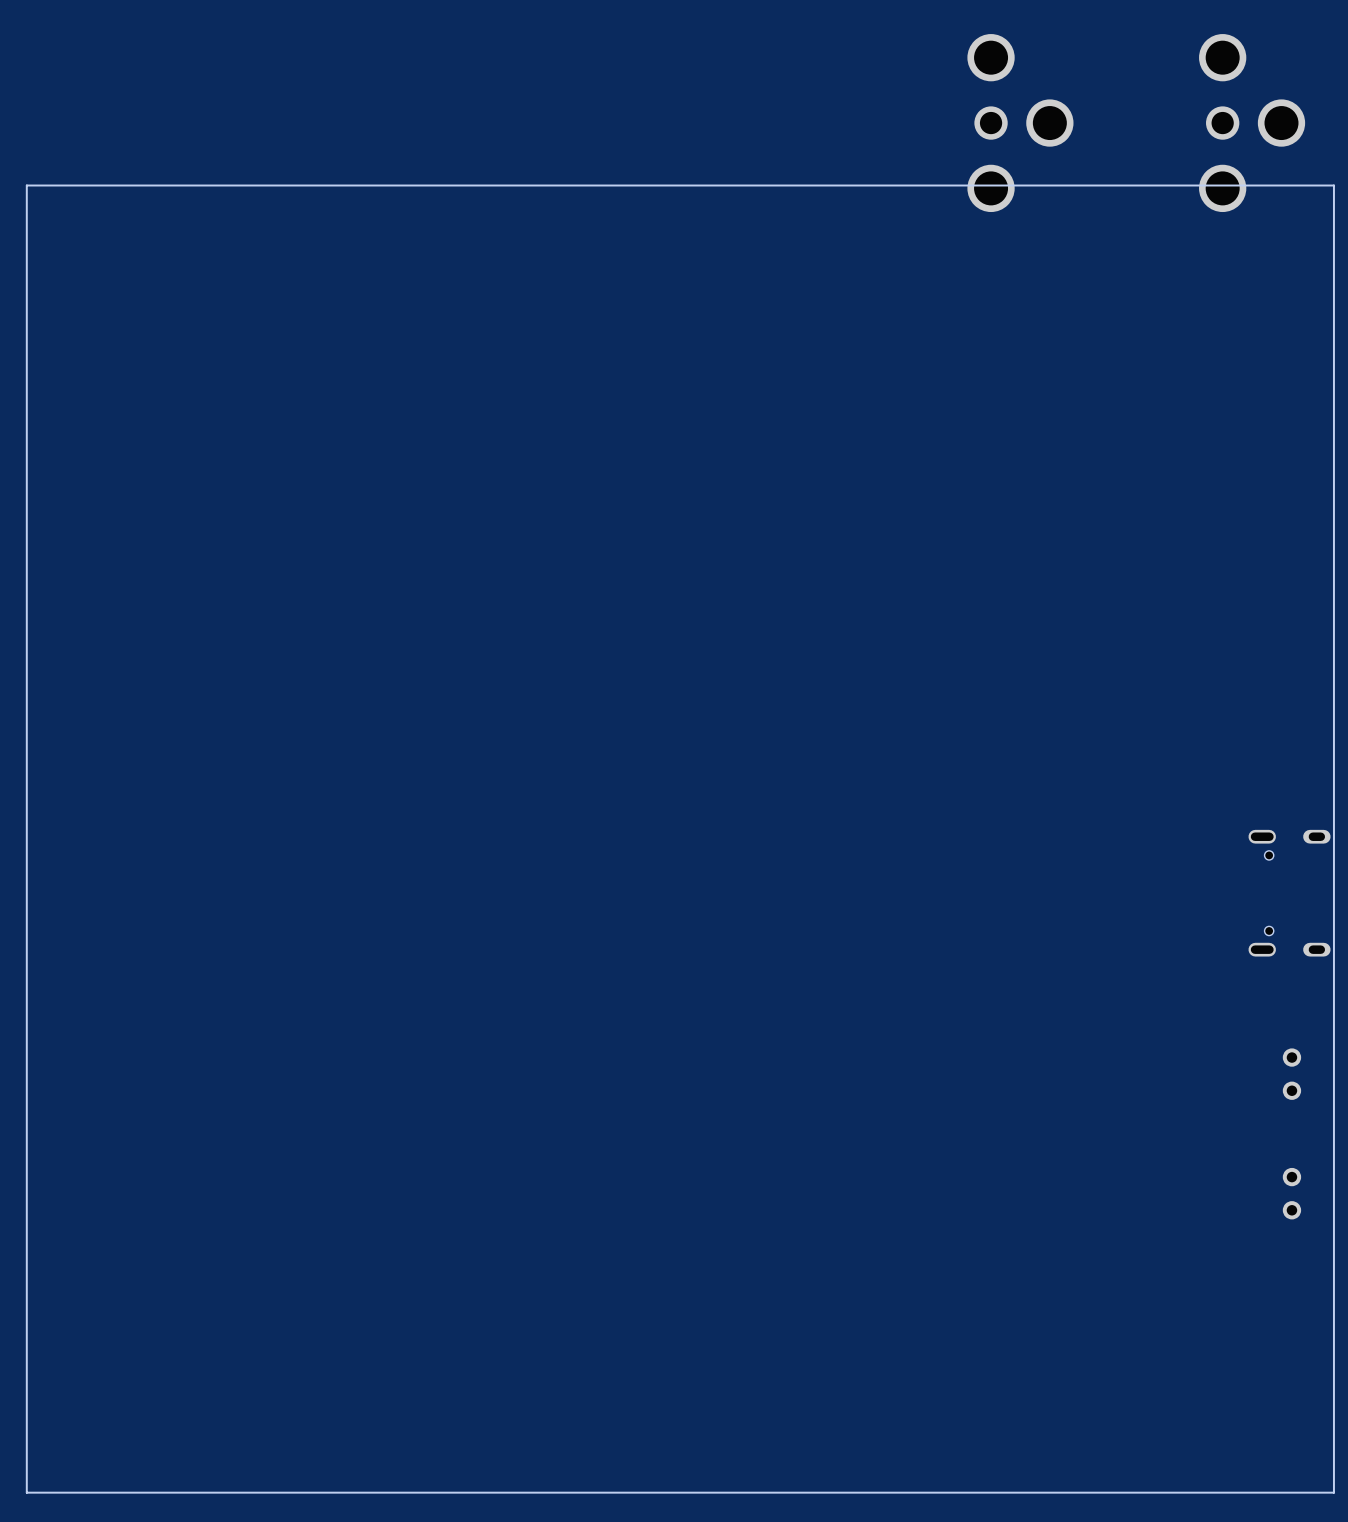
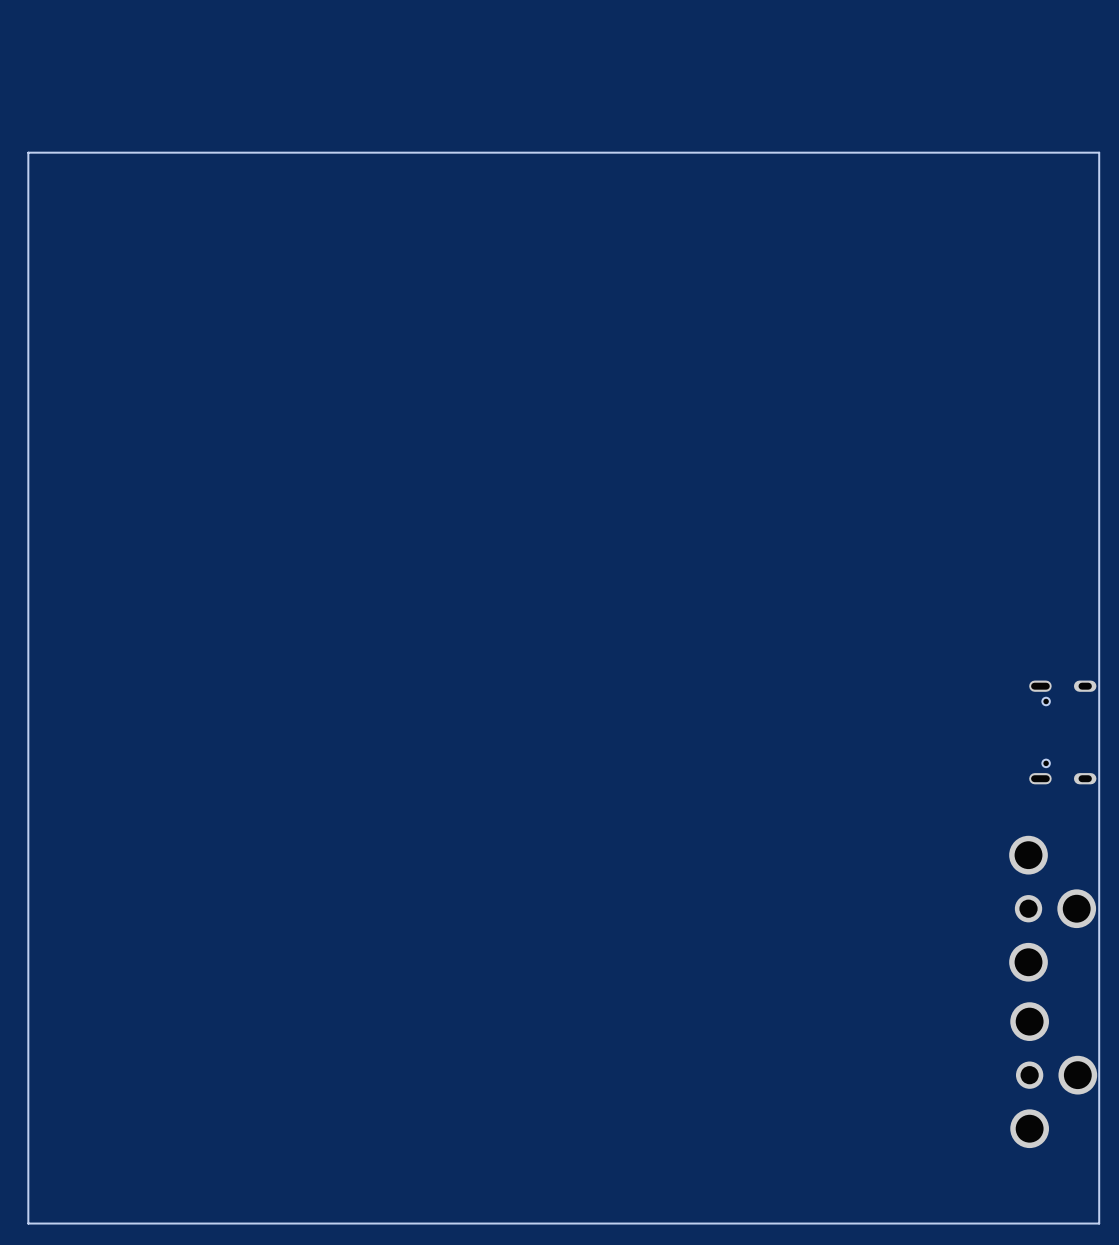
part: (1020, 123) -> none
part: (1252, 123) -> none
part: (1291, 1074) -> none
part: none -> (1052, 908)
part: (1291, 1193) -> none
part: none -> (1053, 1075)

